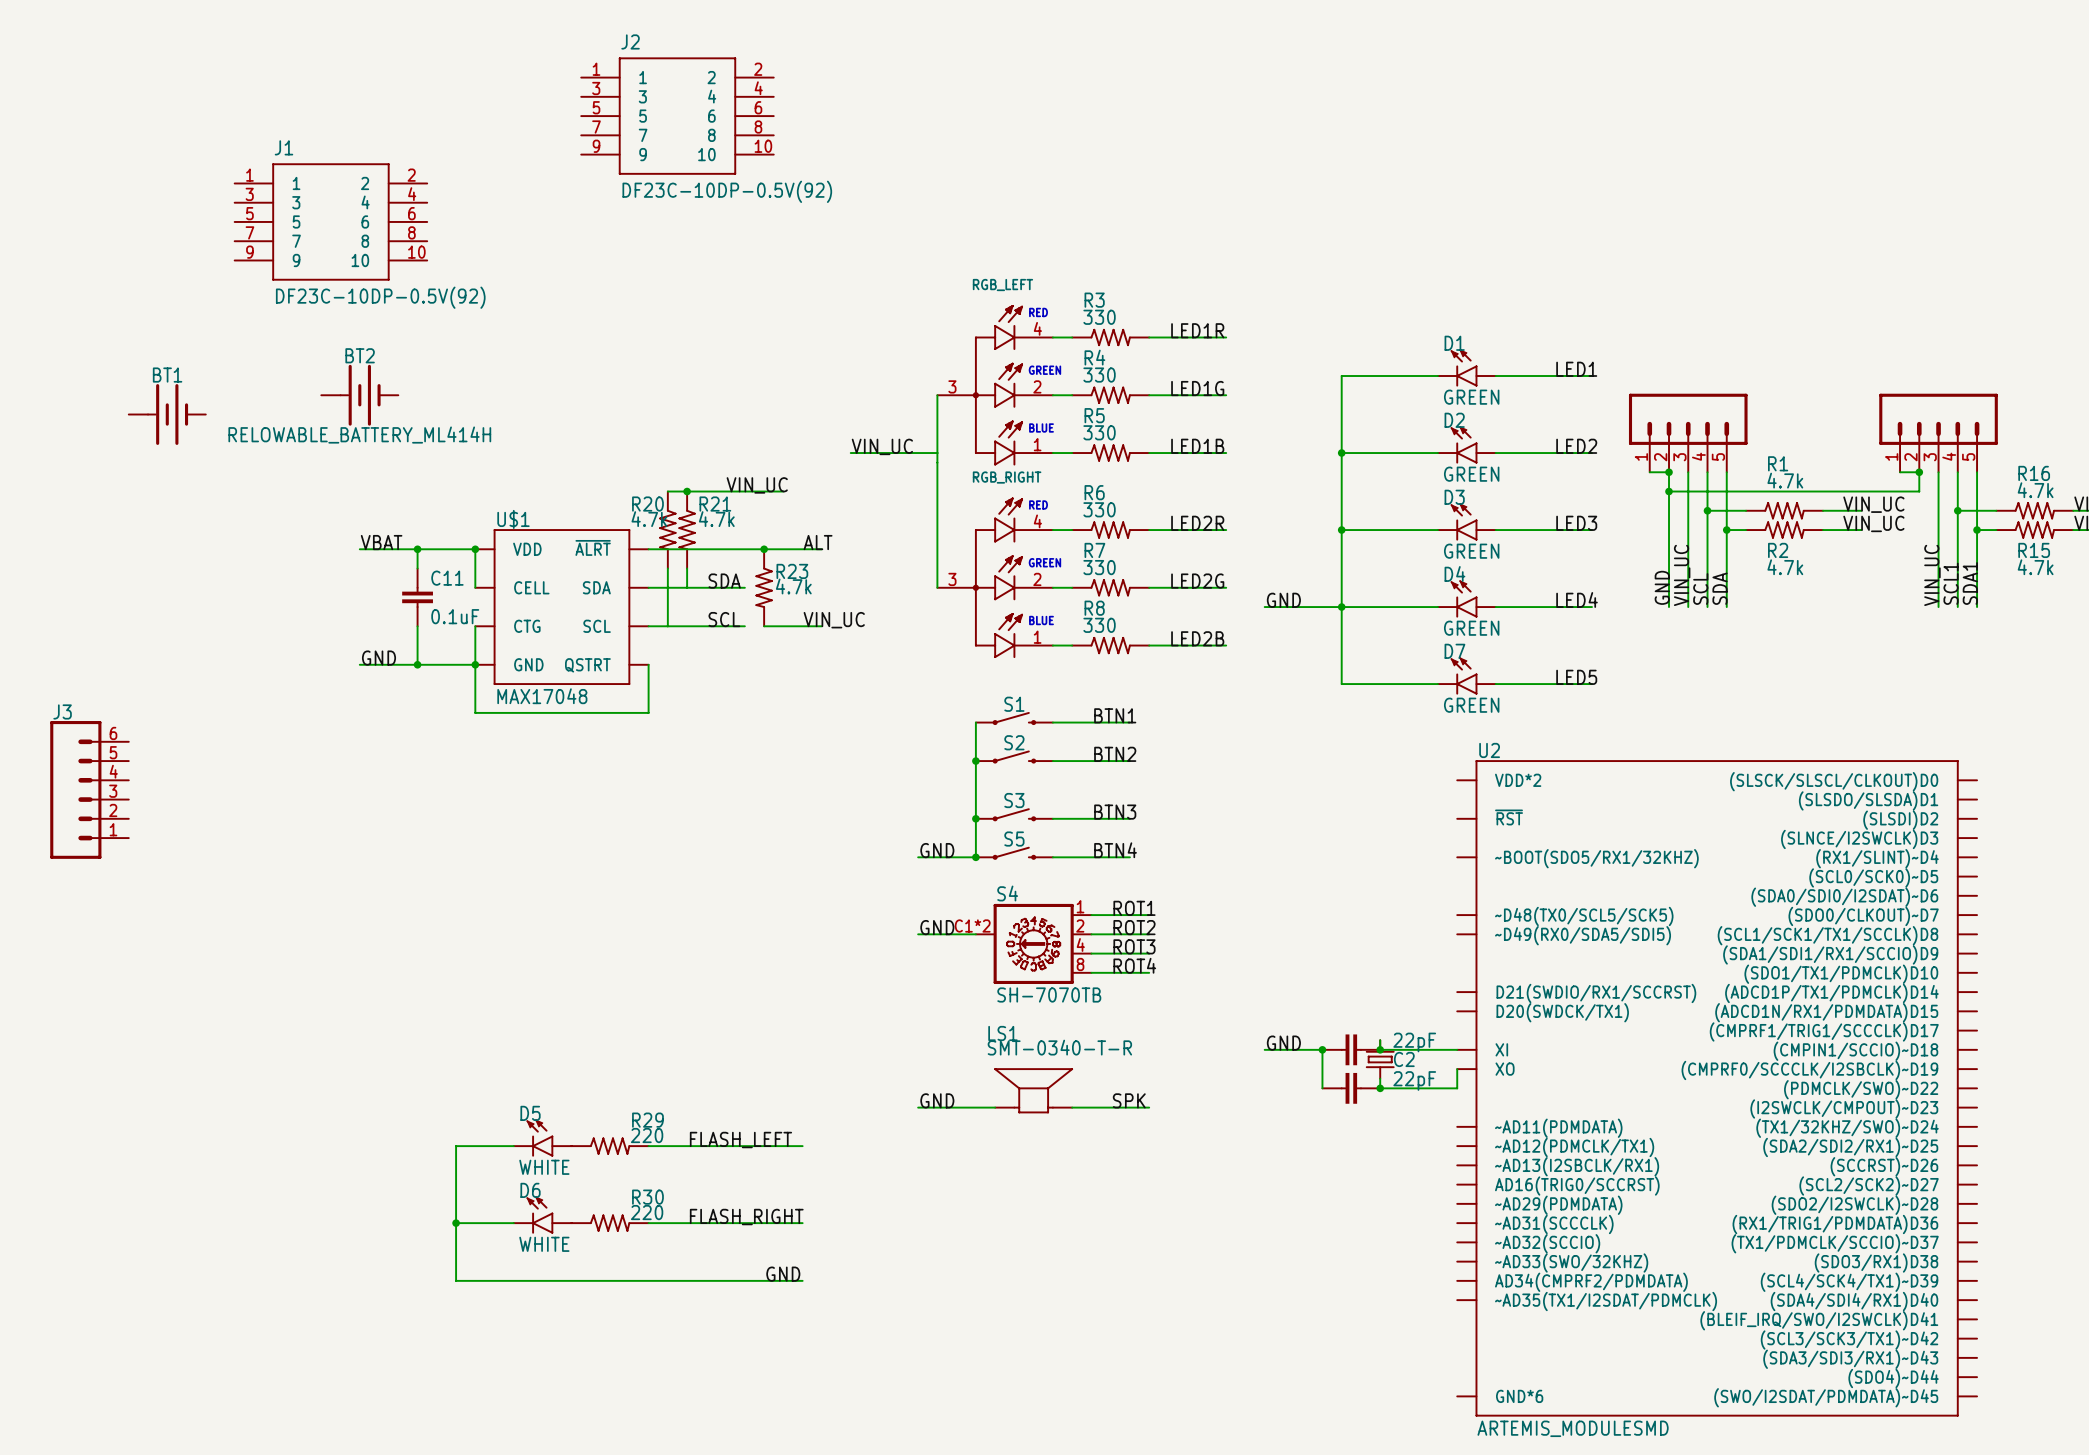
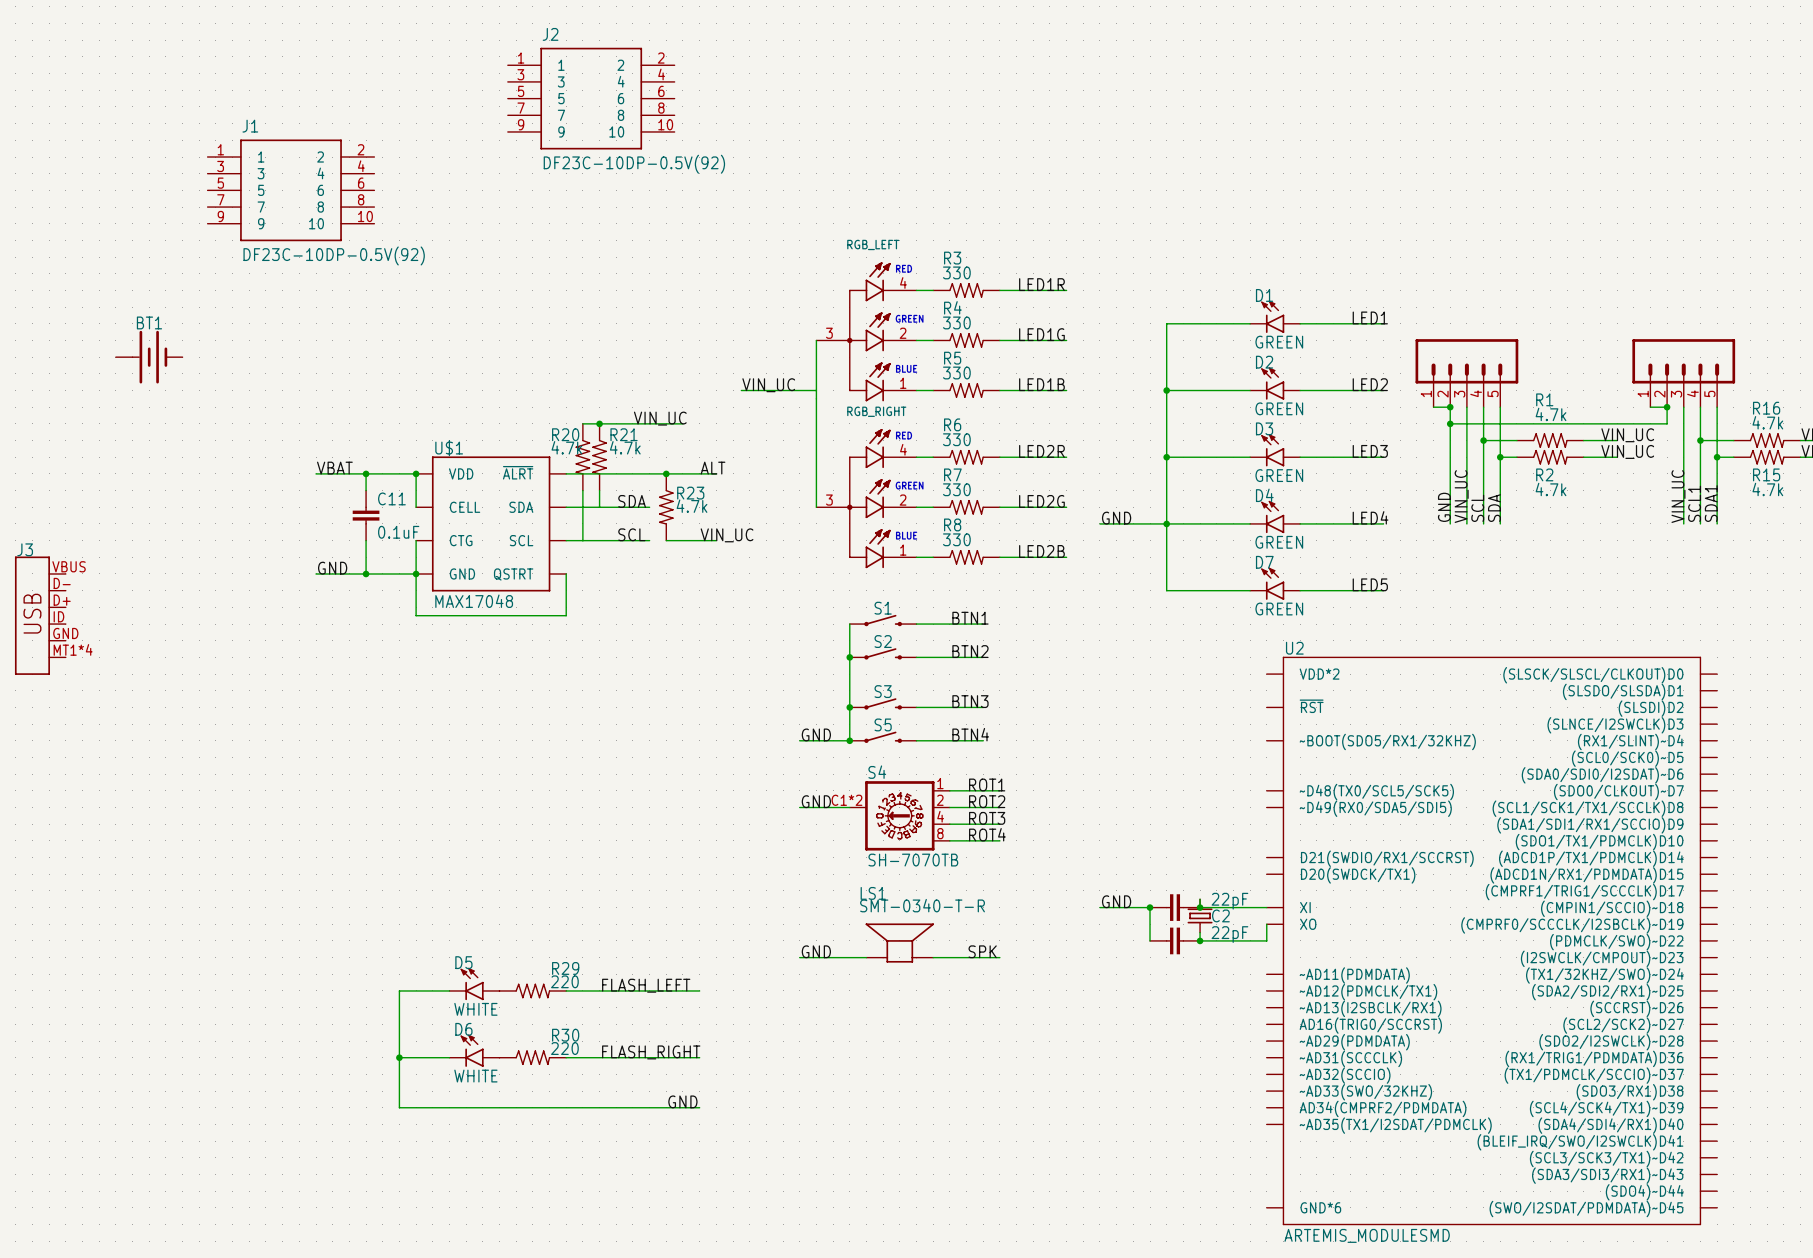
BT2: RELOWABLE_BATTERY_ML414H (359, 395) -> none
J3 symbol: [50, 721, 129, 859] -> [14, 556, 66, 675]

